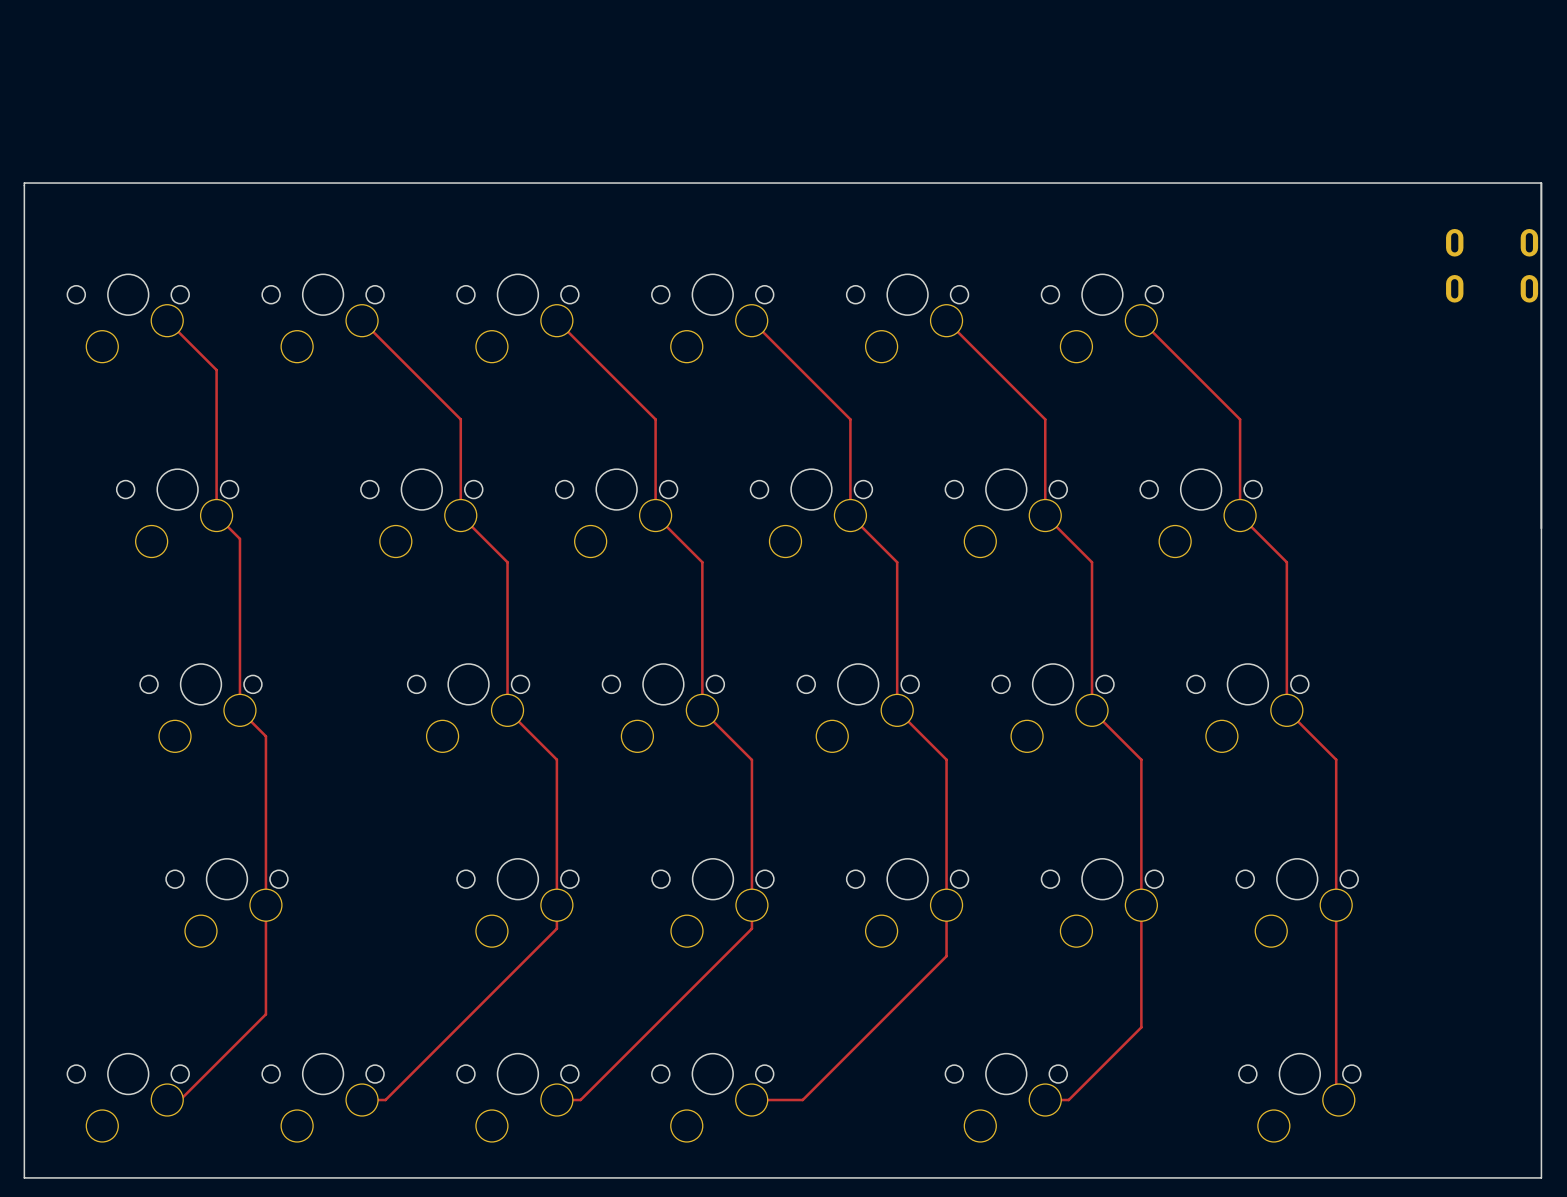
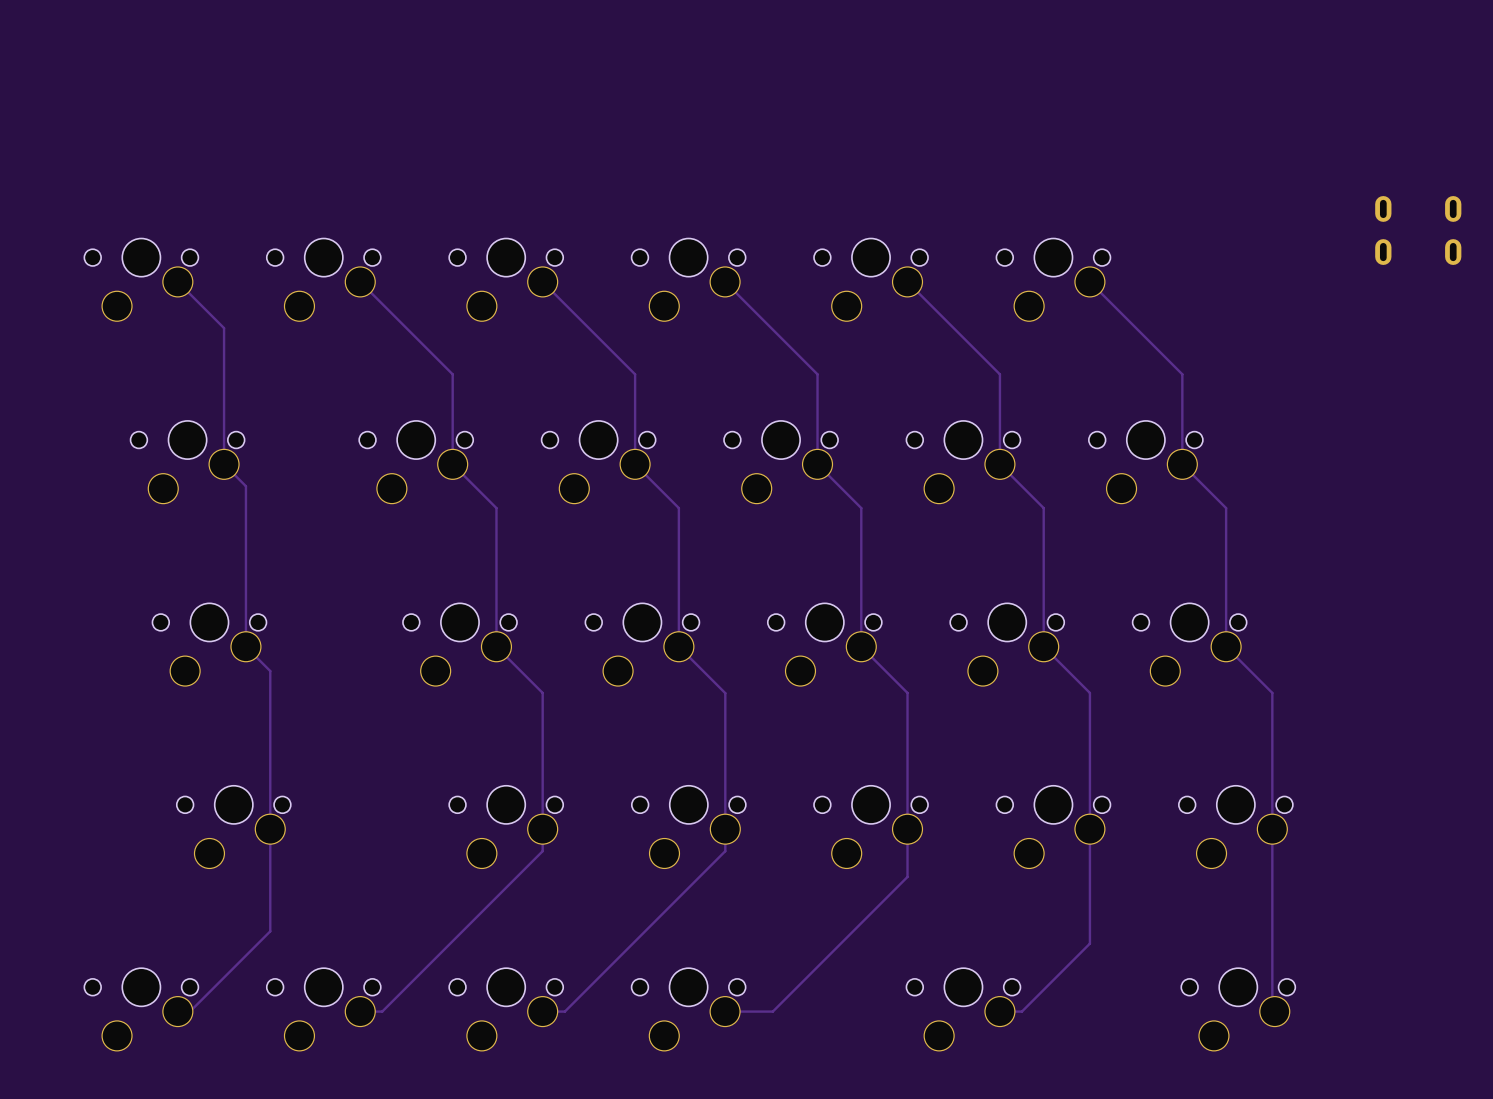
board edge: (24, 183) (1541, 183) (1541, 1177) (24, 1177) (24, 183) -> none

